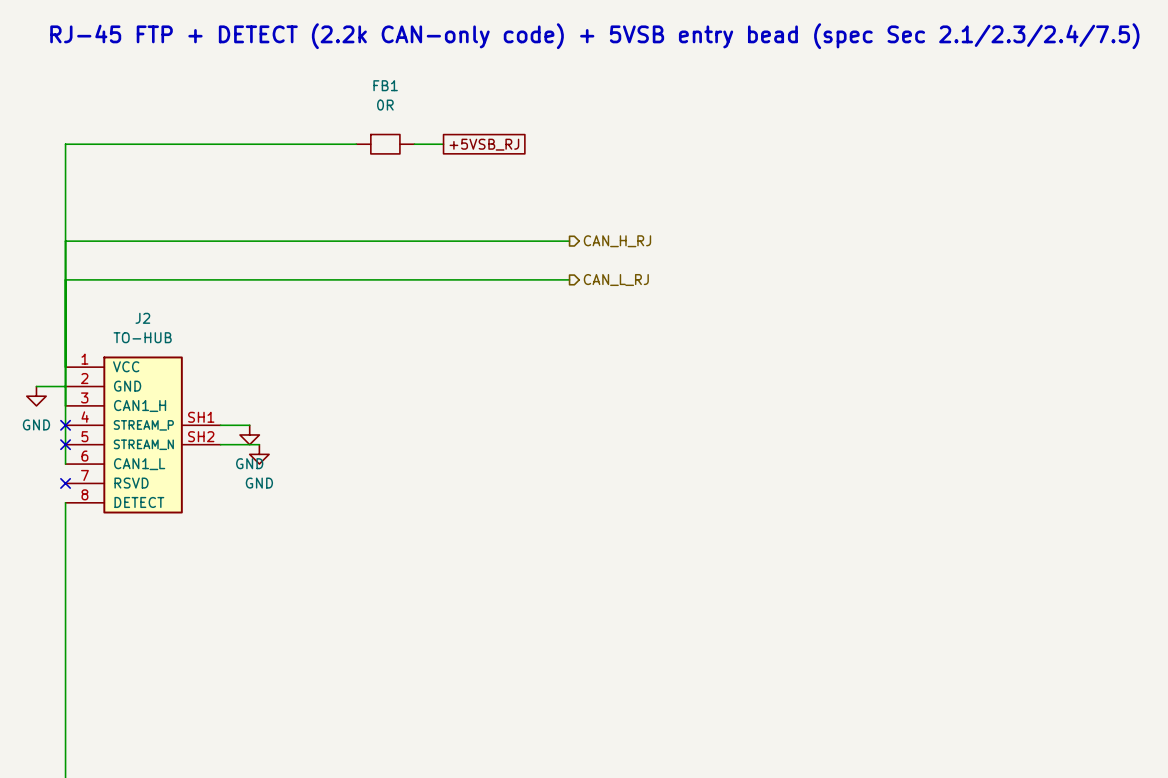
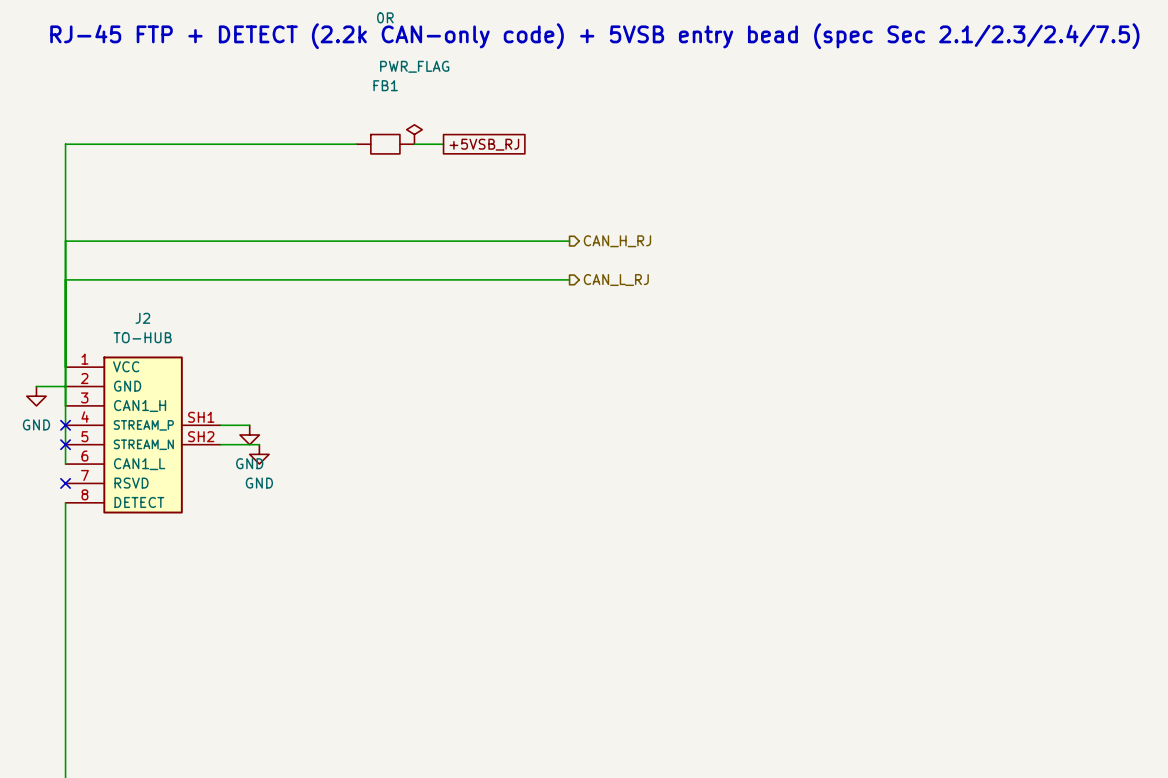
FB1 value position: 0R (385, 105) -> 0R (385, 17)
power symbol: none -> PWR_FLAG (414, 134)

